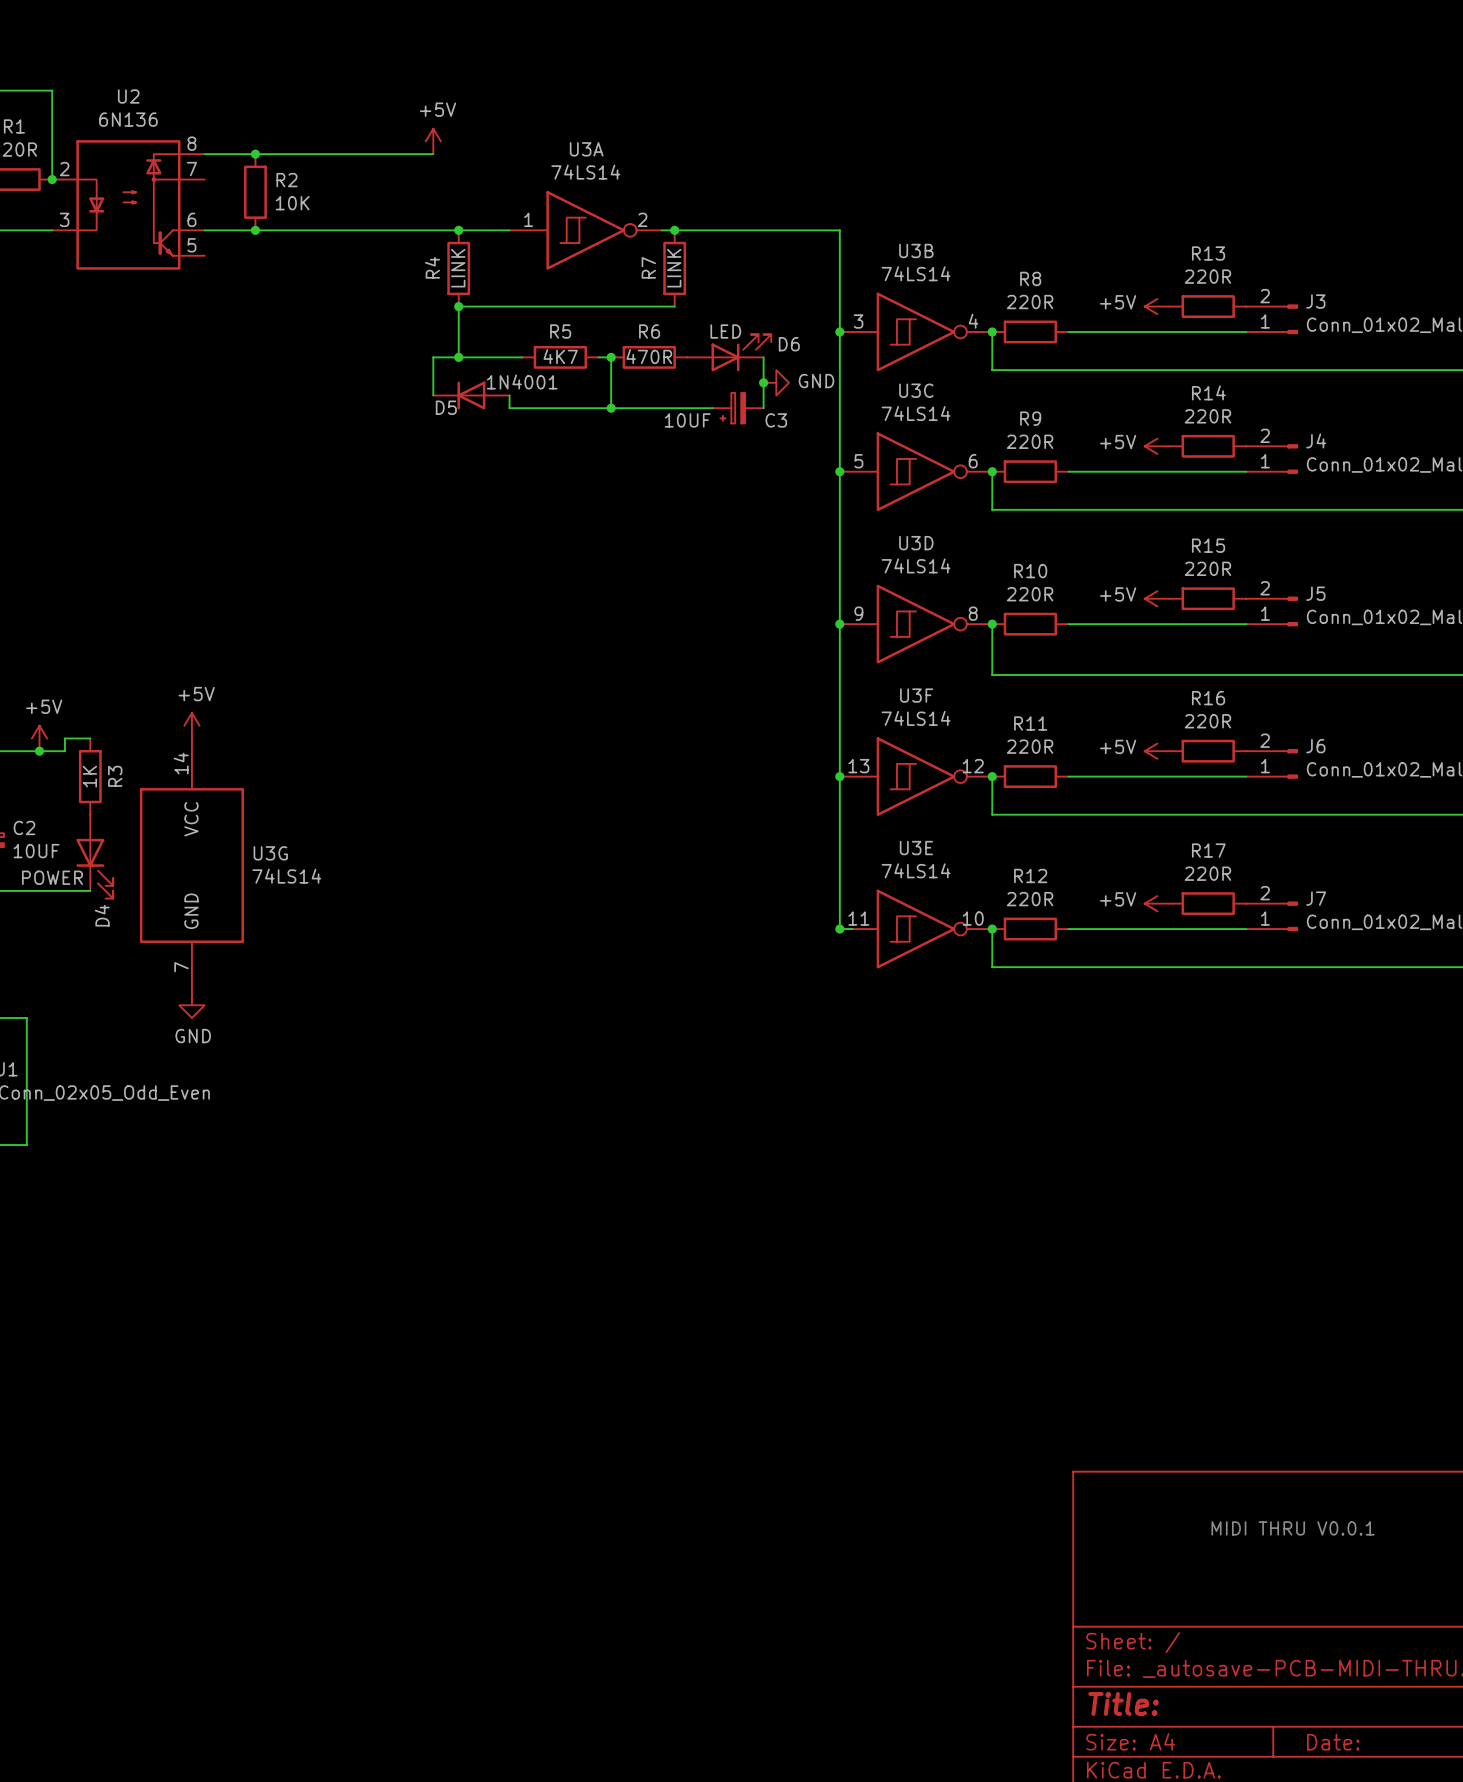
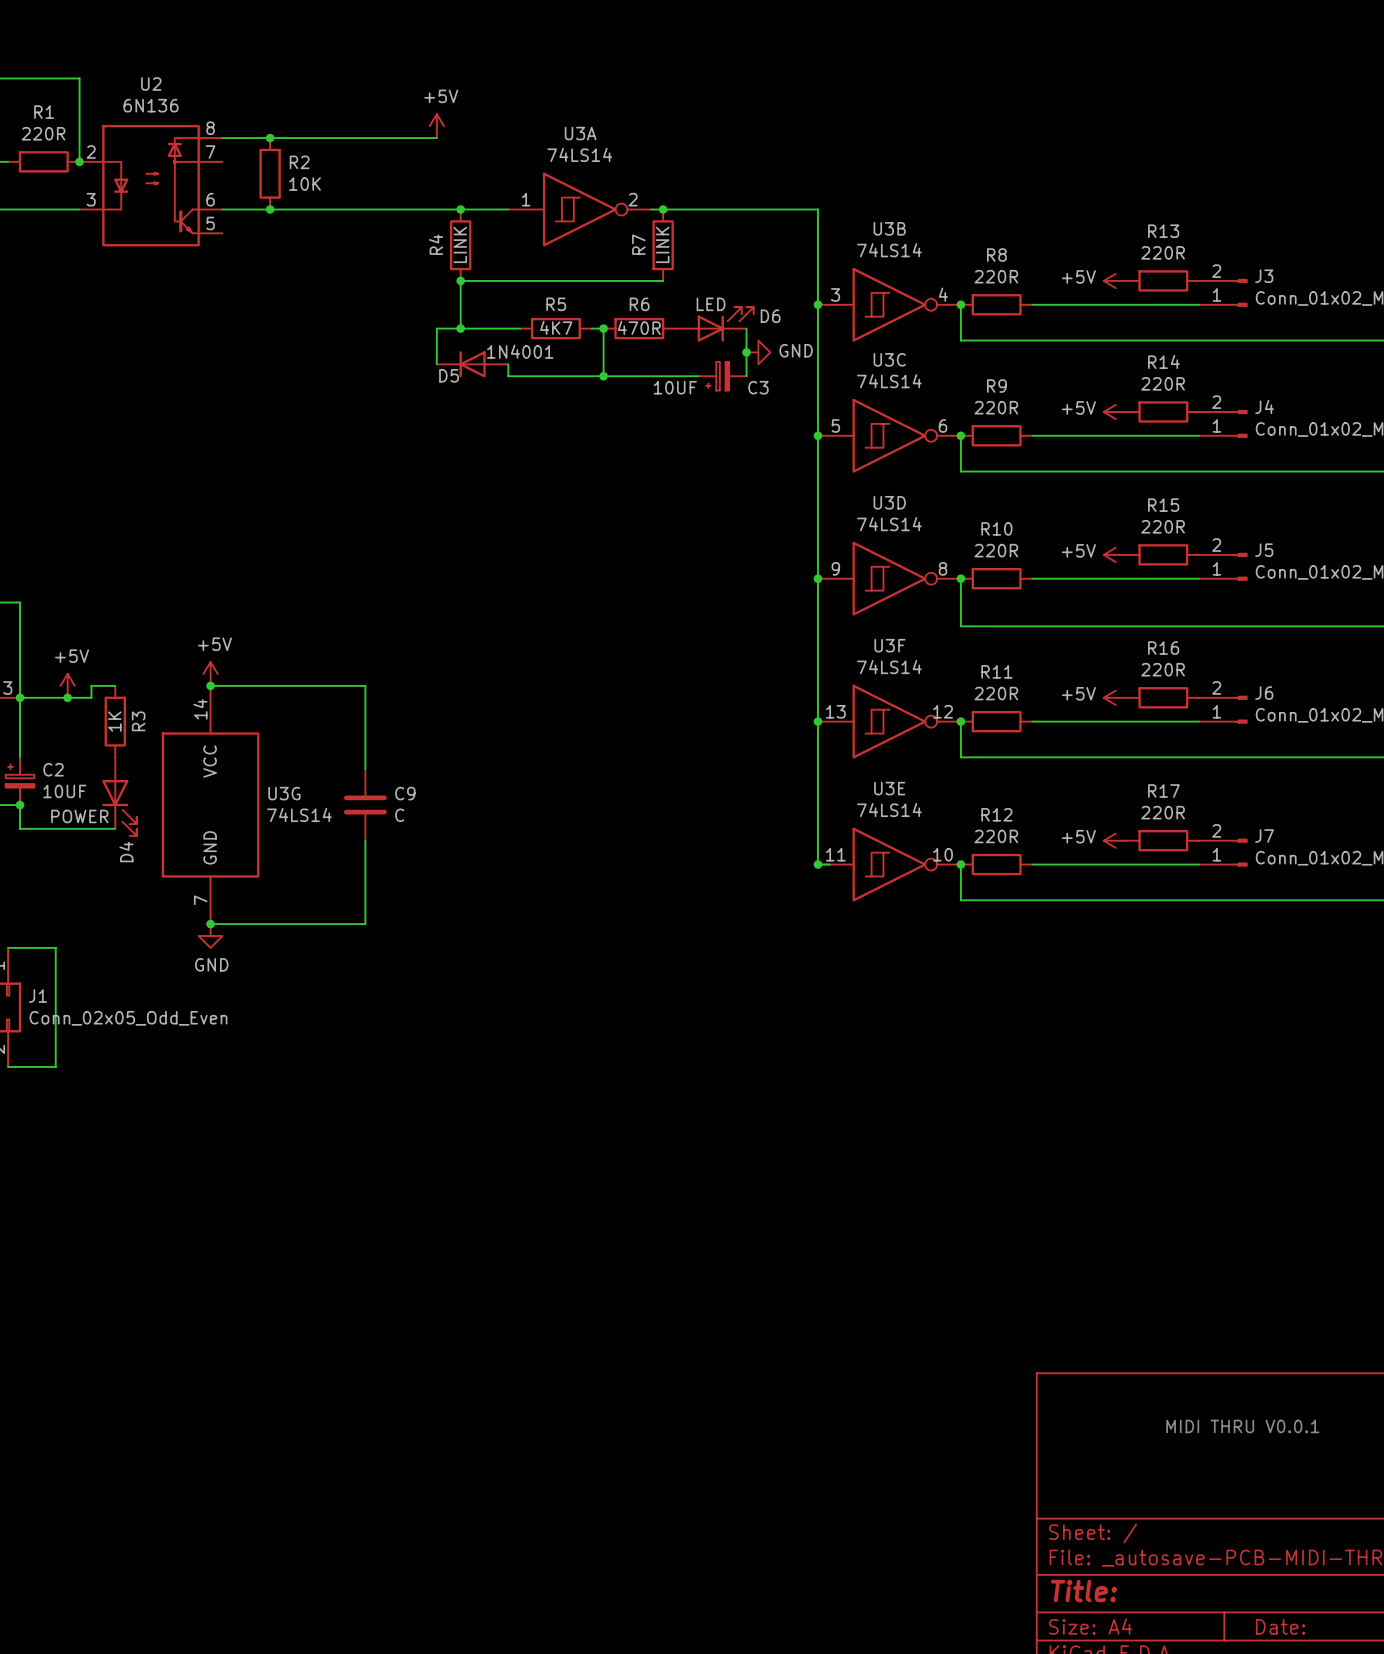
wire: none -> (210, 685) (365, 685) (365, 769)
junction: none -> (210, 685)
C9: none -> C (365, 804)
wire: none -> (365, 840) (365, 924) (210, 924)
junction: none -> (210, 924)

